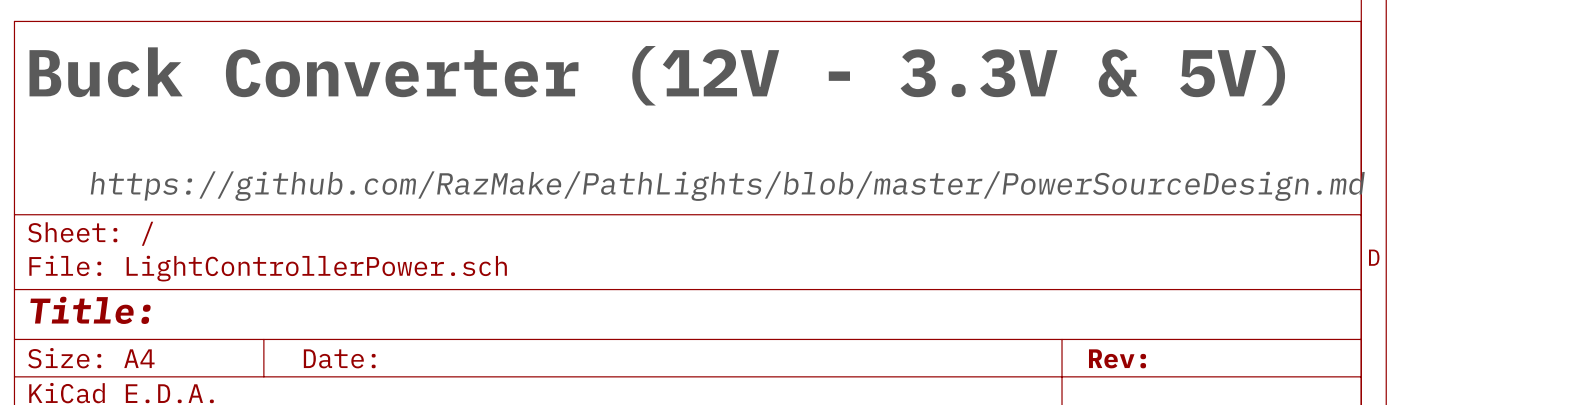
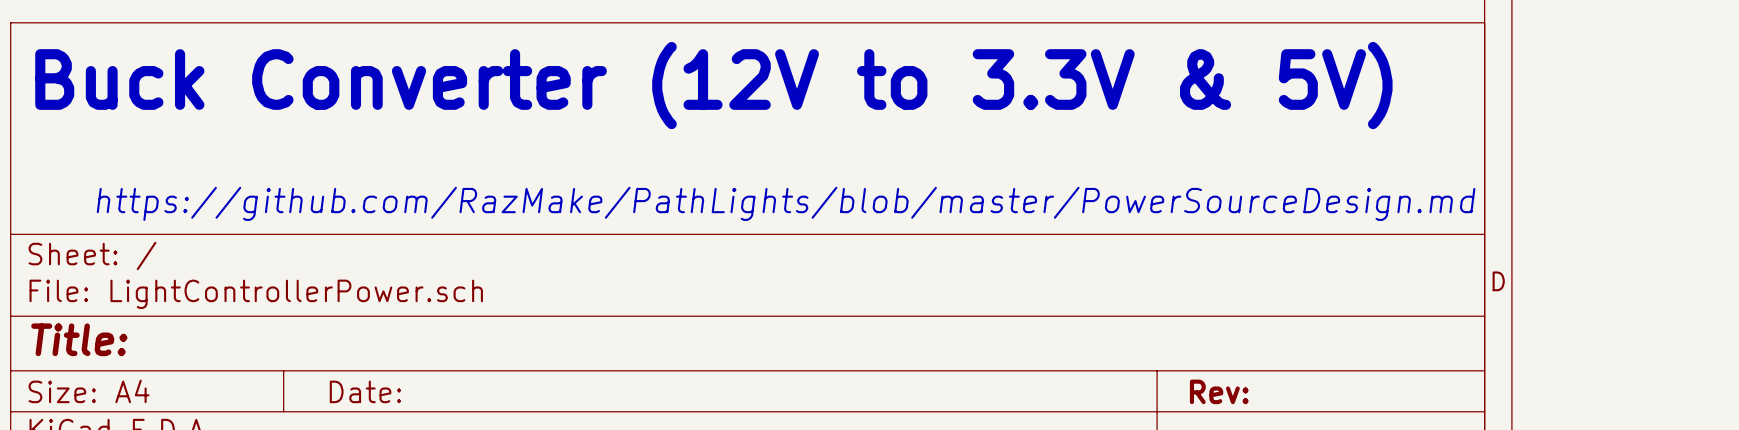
text: Buck Converter (12V - 3.3V & 5V) (657, 75) -> Buck Converter (12V to 3.3V & 5V) (713, 85)

